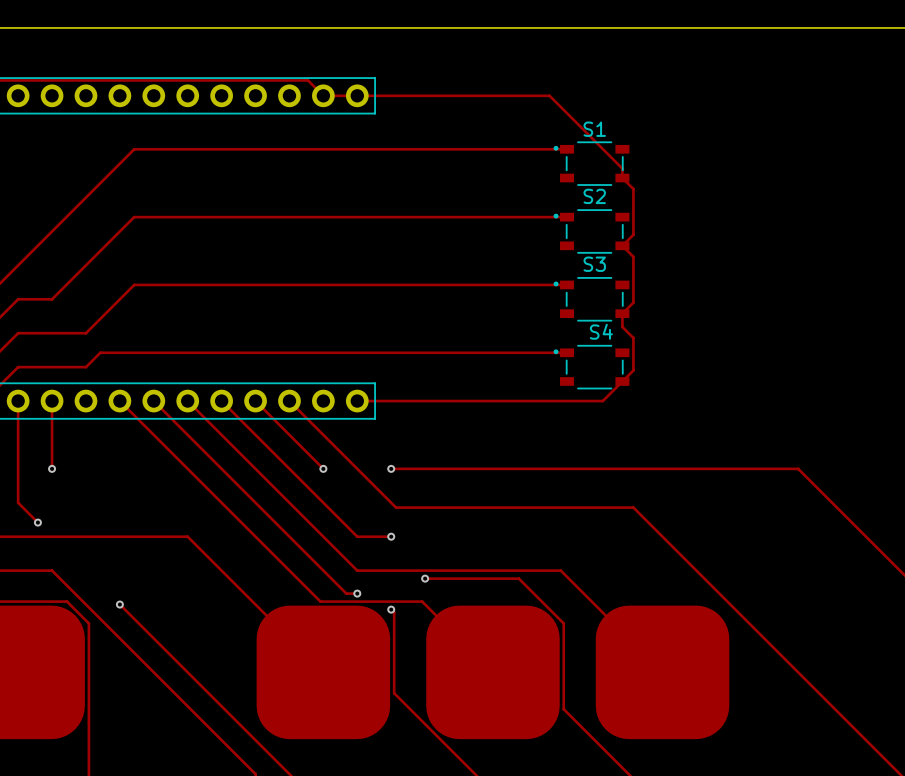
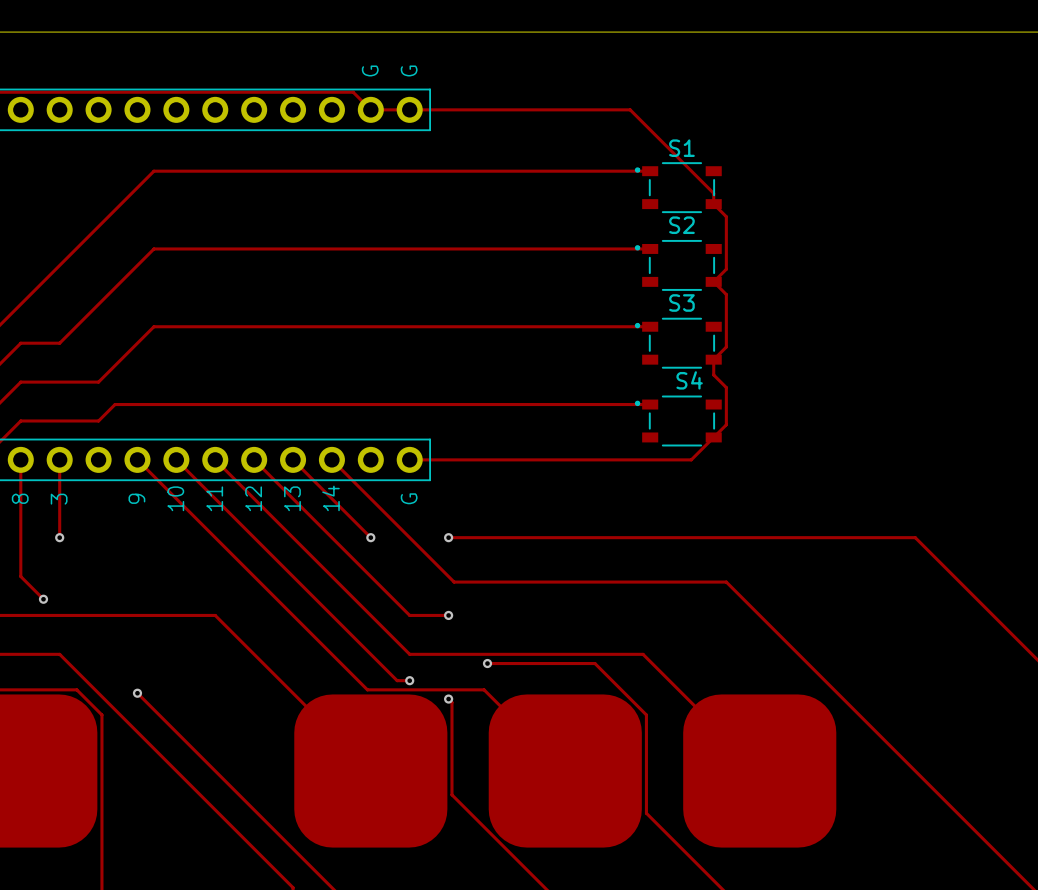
text: none -> G (370, 70)
text: none -> G (409, 70)
text: none -> 8 (20, 498)
text: none -> 9 (136, 498)
text: none -> 10 (175, 498)
text: none -> 11 (214, 498)
text: none -> 12 (253, 498)
text: none -> 13 (292, 498)
text: none -> 14 (331, 498)
text: none -> G (409, 498)
text: none -> 3 (59, 499)

